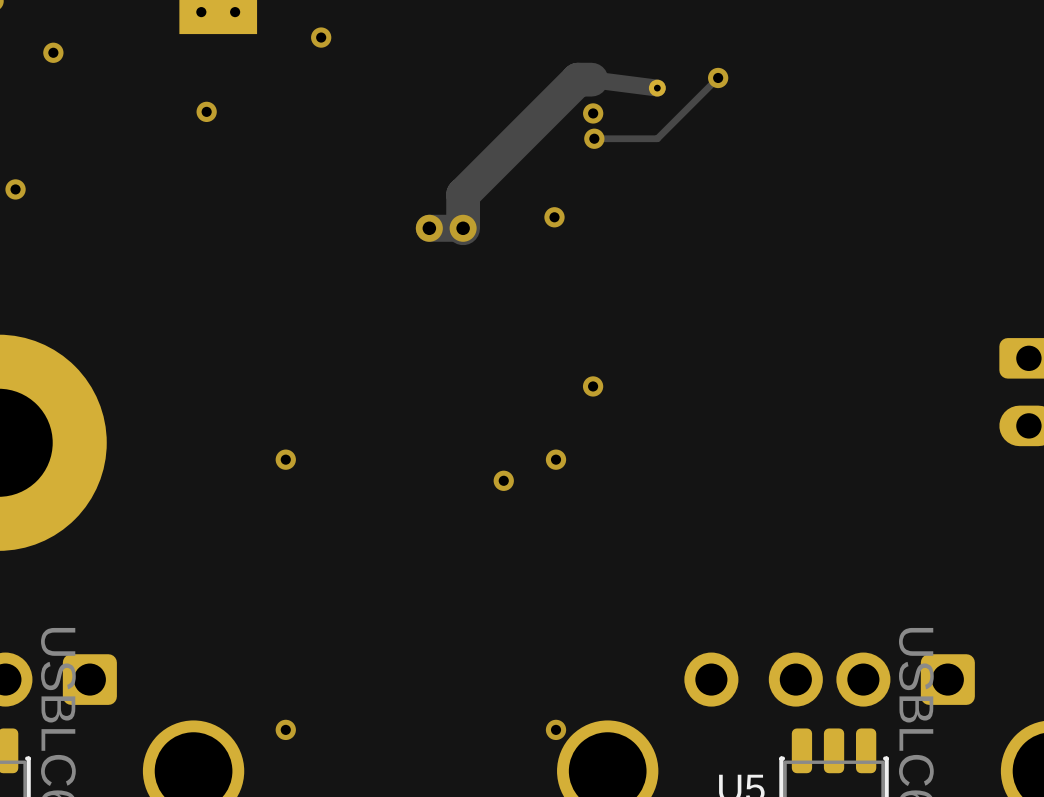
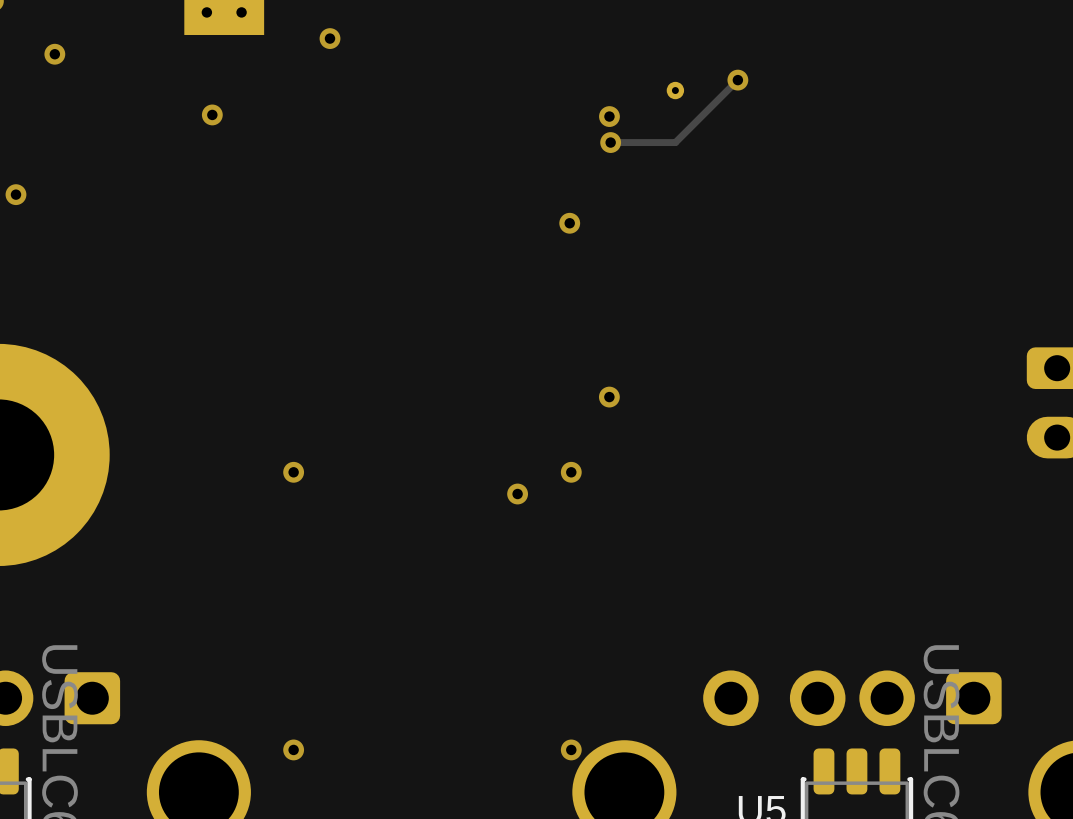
track: (657, 88) (577, 79) (463, 194) (463, 228) (429, 228) -> none
via: (429, 228) -> none
via: (463, 228) -> none

